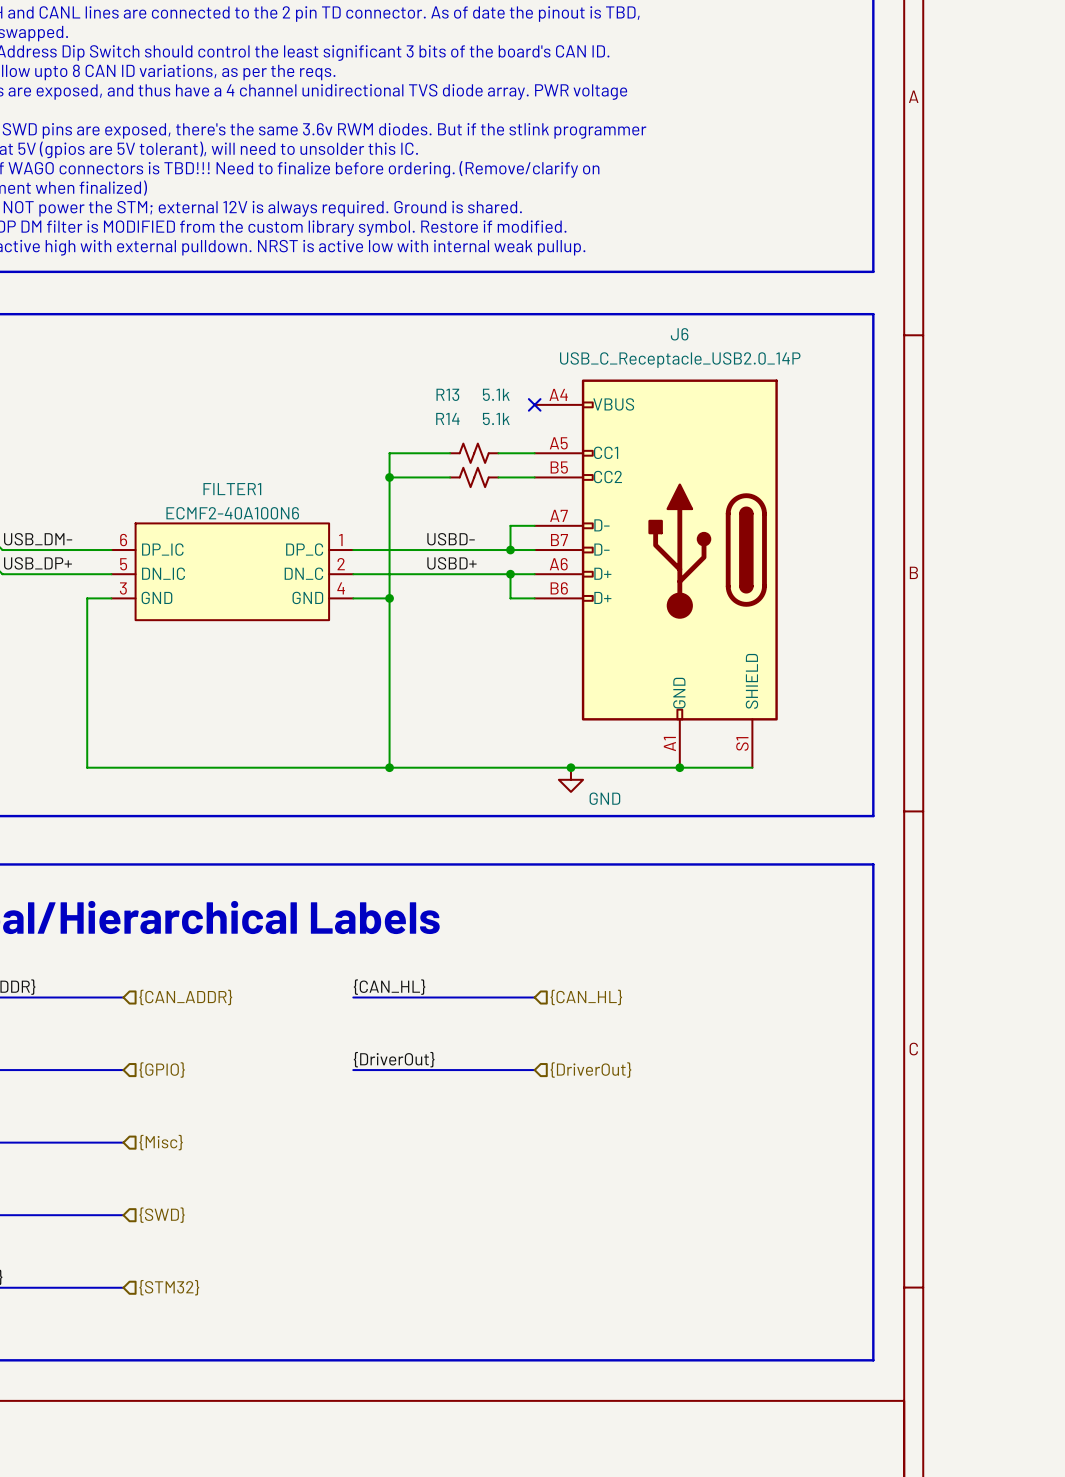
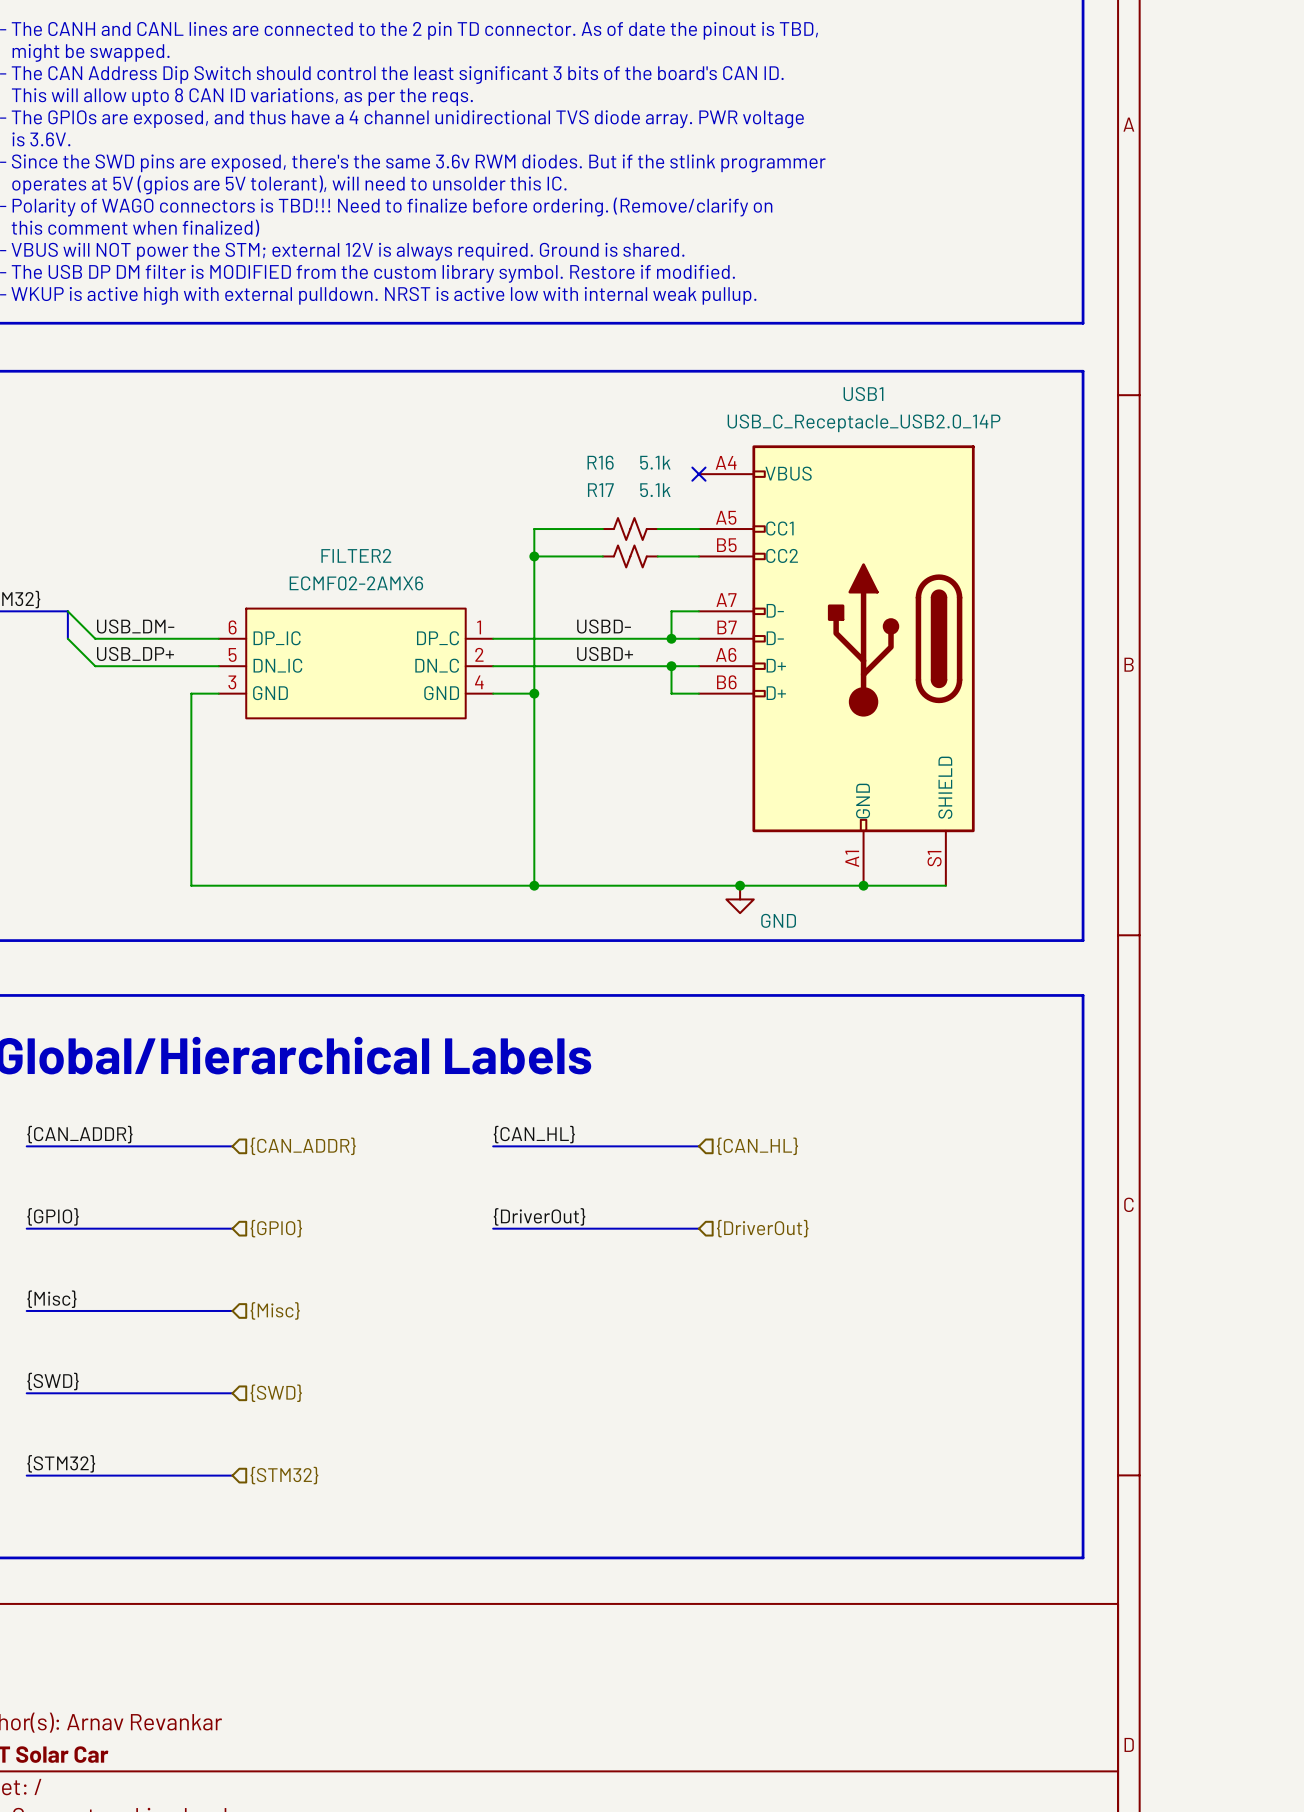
J6 name: J6 (679, 334) -> USB1 (863, 394)
R13 name: R13 (447, 394) -> R16 (600, 462)
R14 name: R14 (447, 418) -> R17 (600, 490)
FILTER1 name: FILTER1 (232, 489) -> FILTER2 (356, 555)
FILTER1 value: ECMF2-40A100N6 (232, 513) -> ECMF02-2AMX6 (356, 583)

